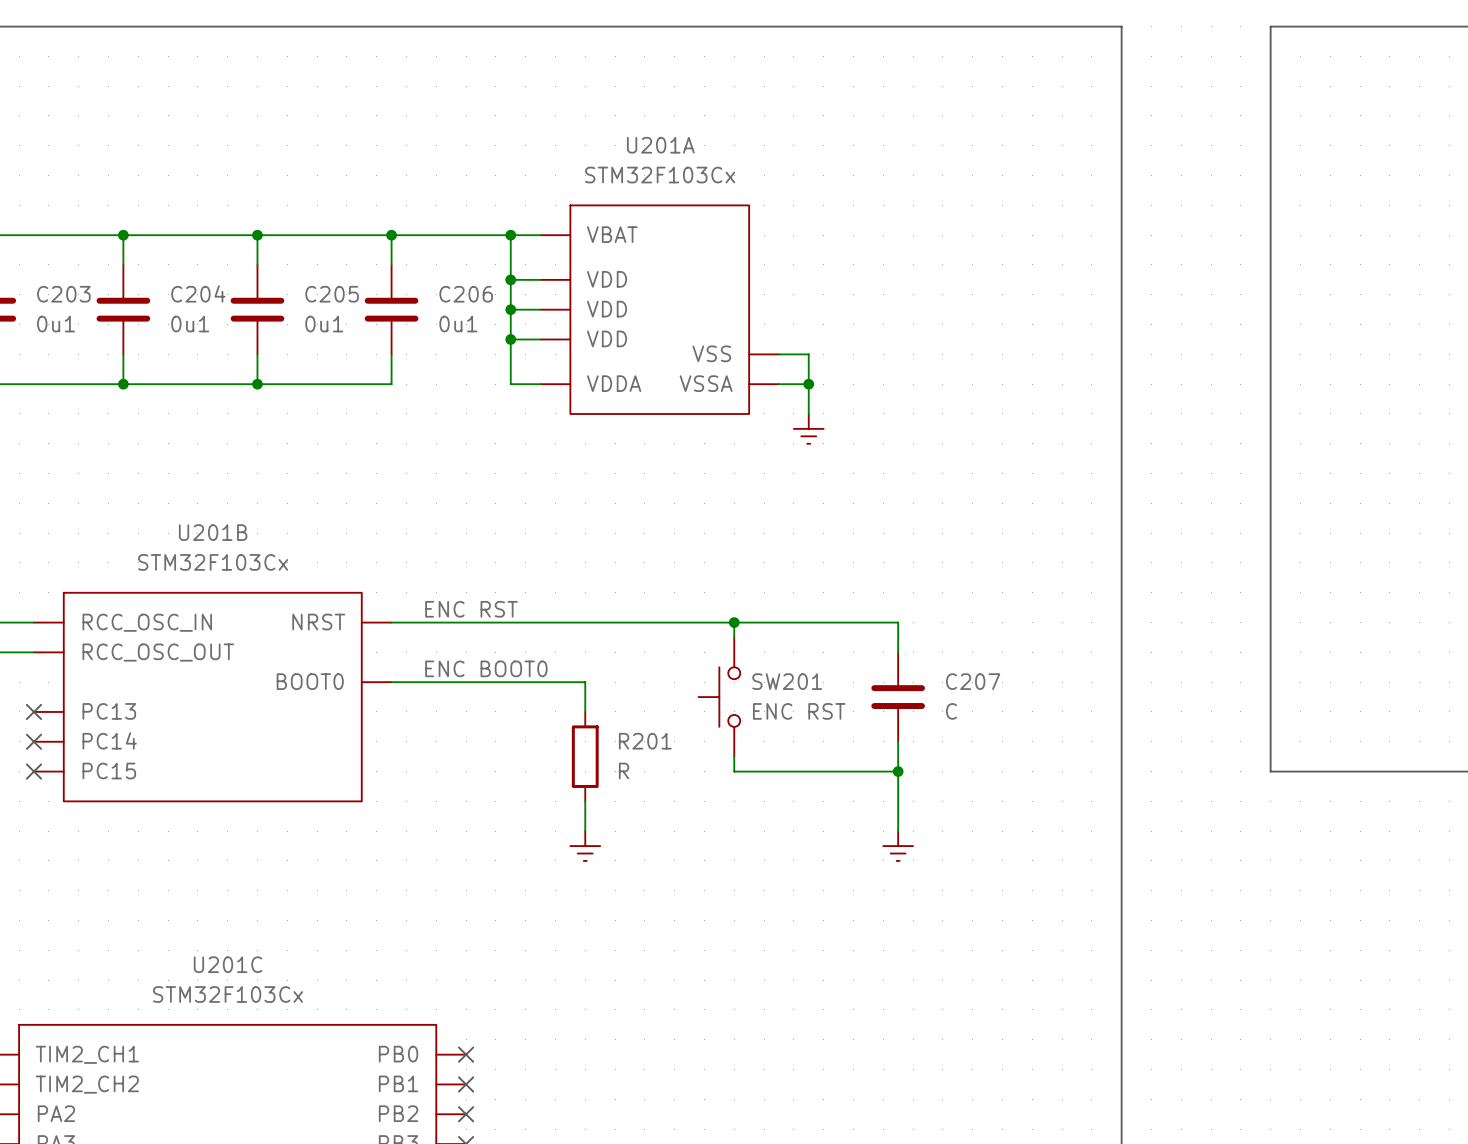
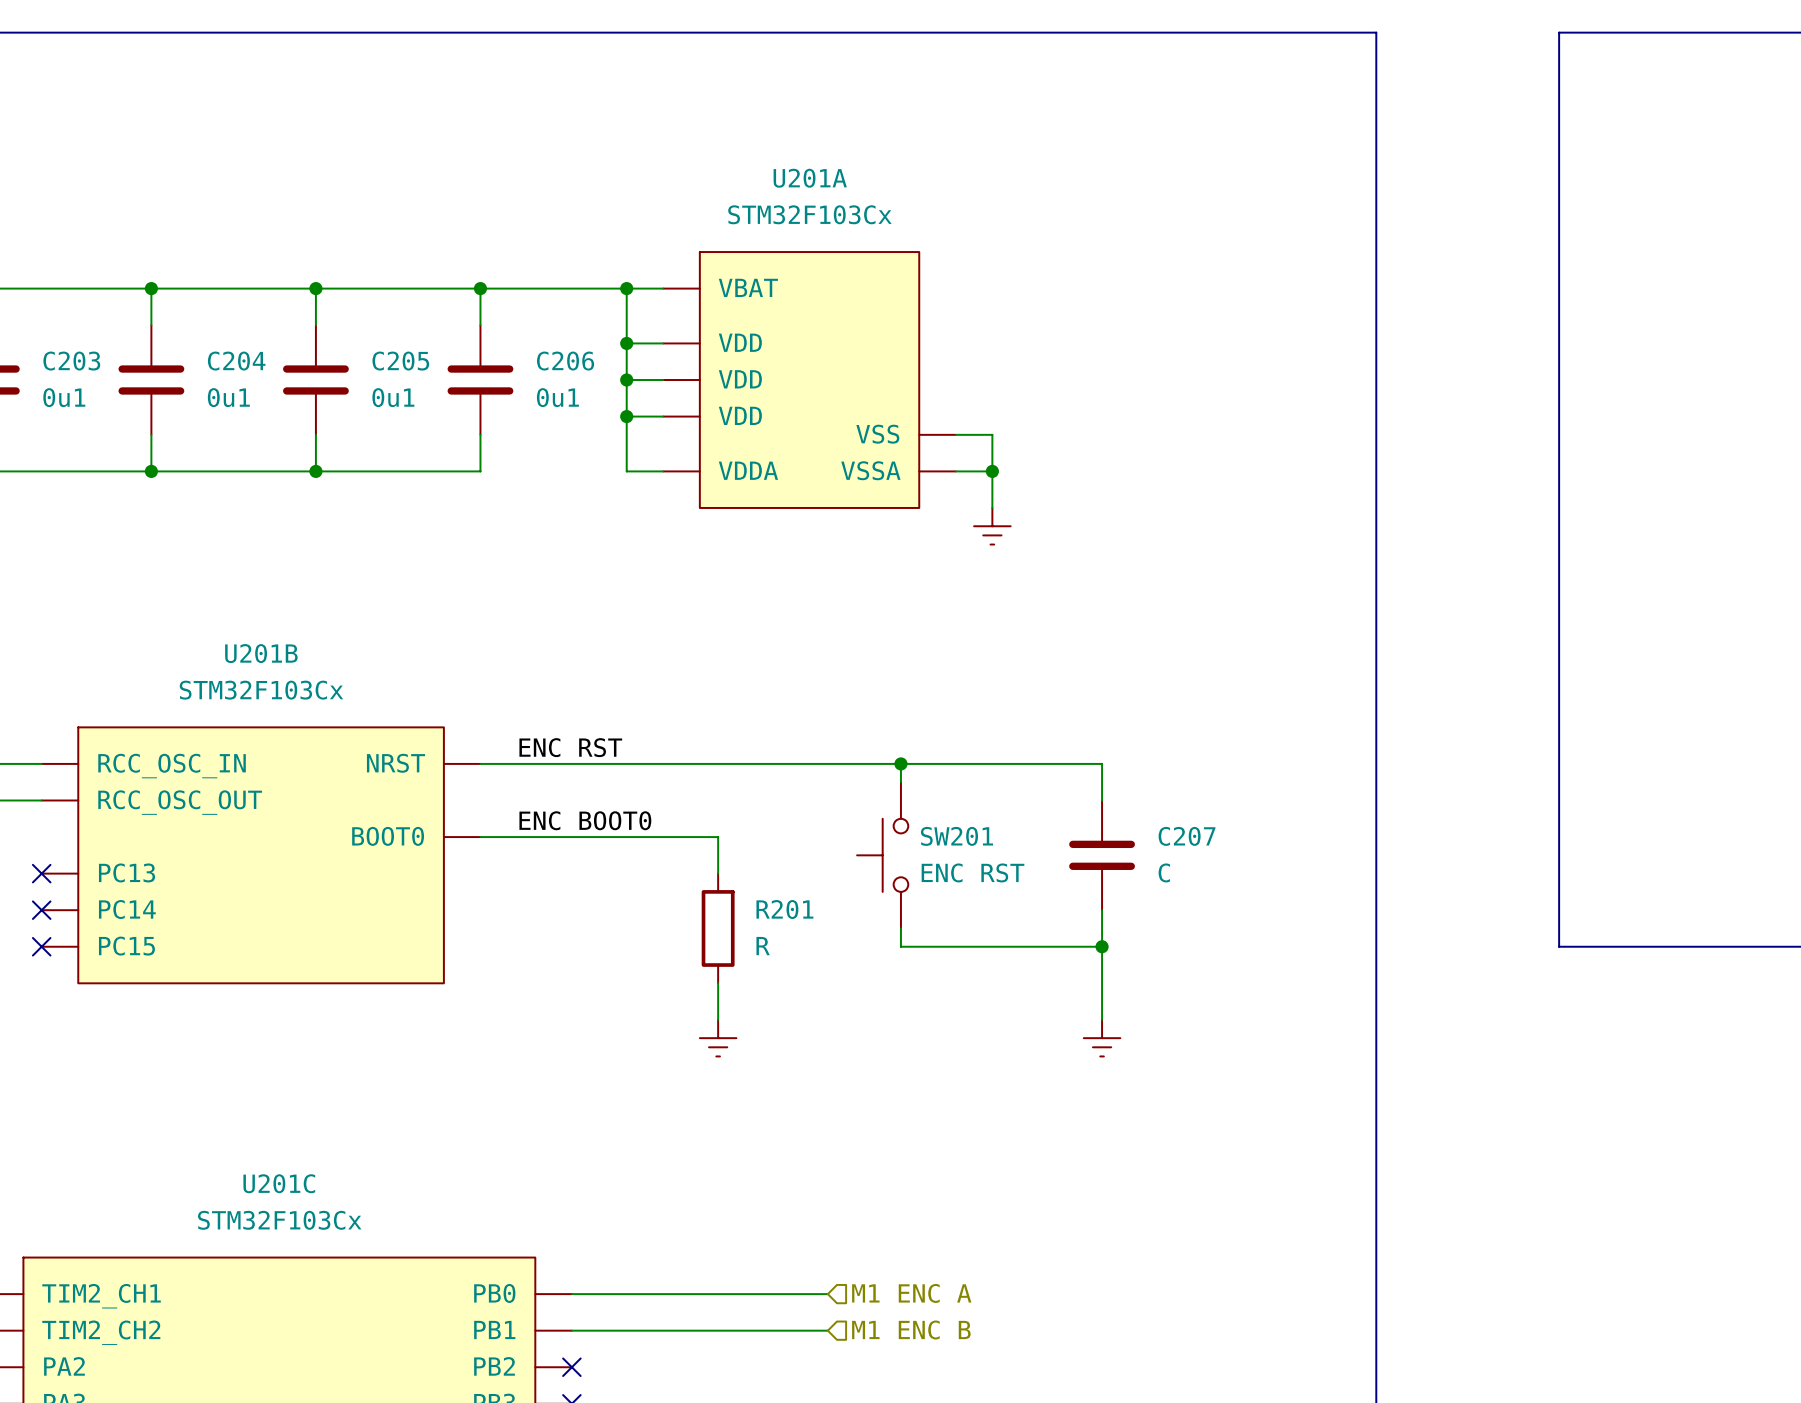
wire: none -> (571, 1294) (827, 1294)
no-connect mark: (466, 1054) -> none
hierarchical label: none -> M1 ENC A (911, 1293)
hierarchical label: none -> M1 ENC B (911, 1330)
wire: none -> (571, 1330) (827, 1330)
no-connect mark: (466, 1084) -> none

